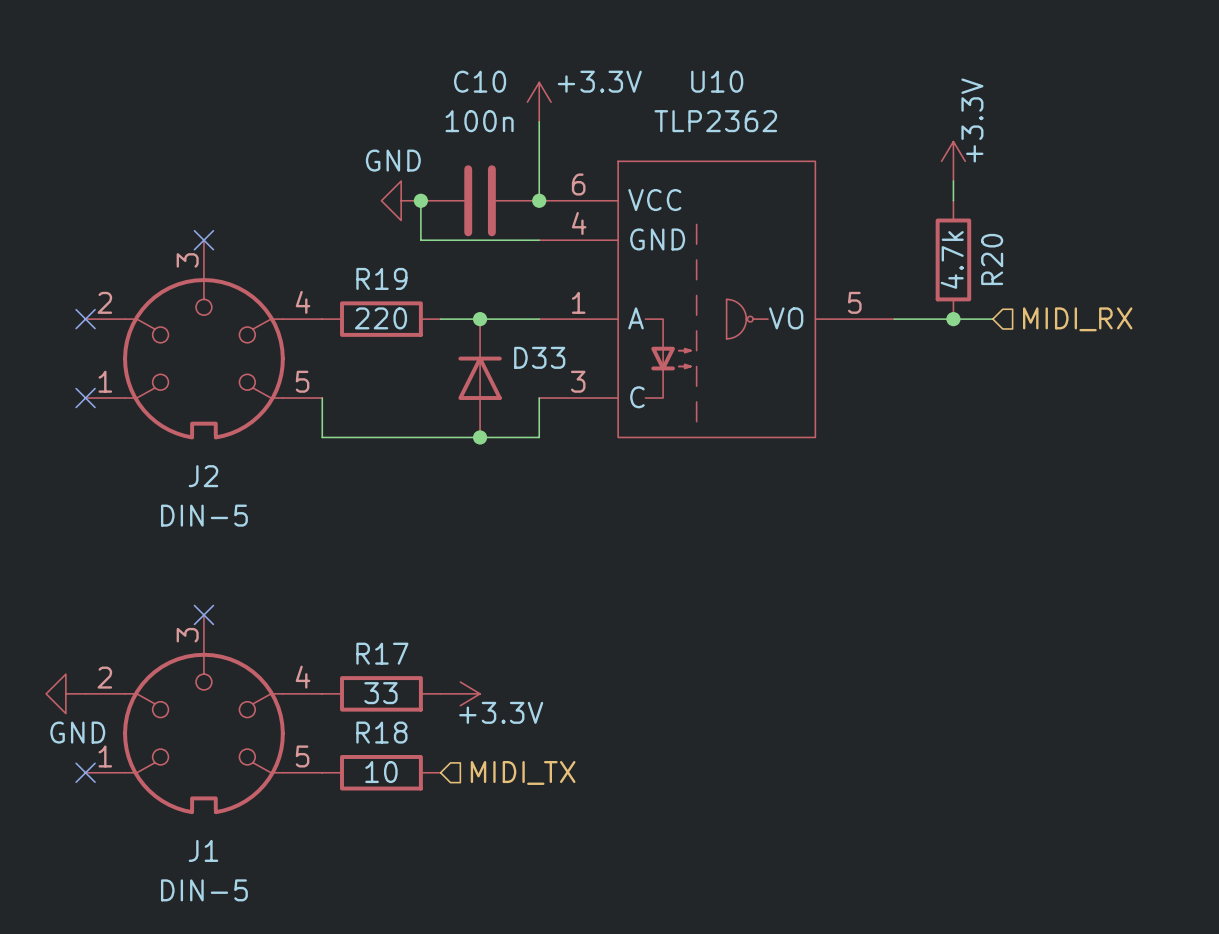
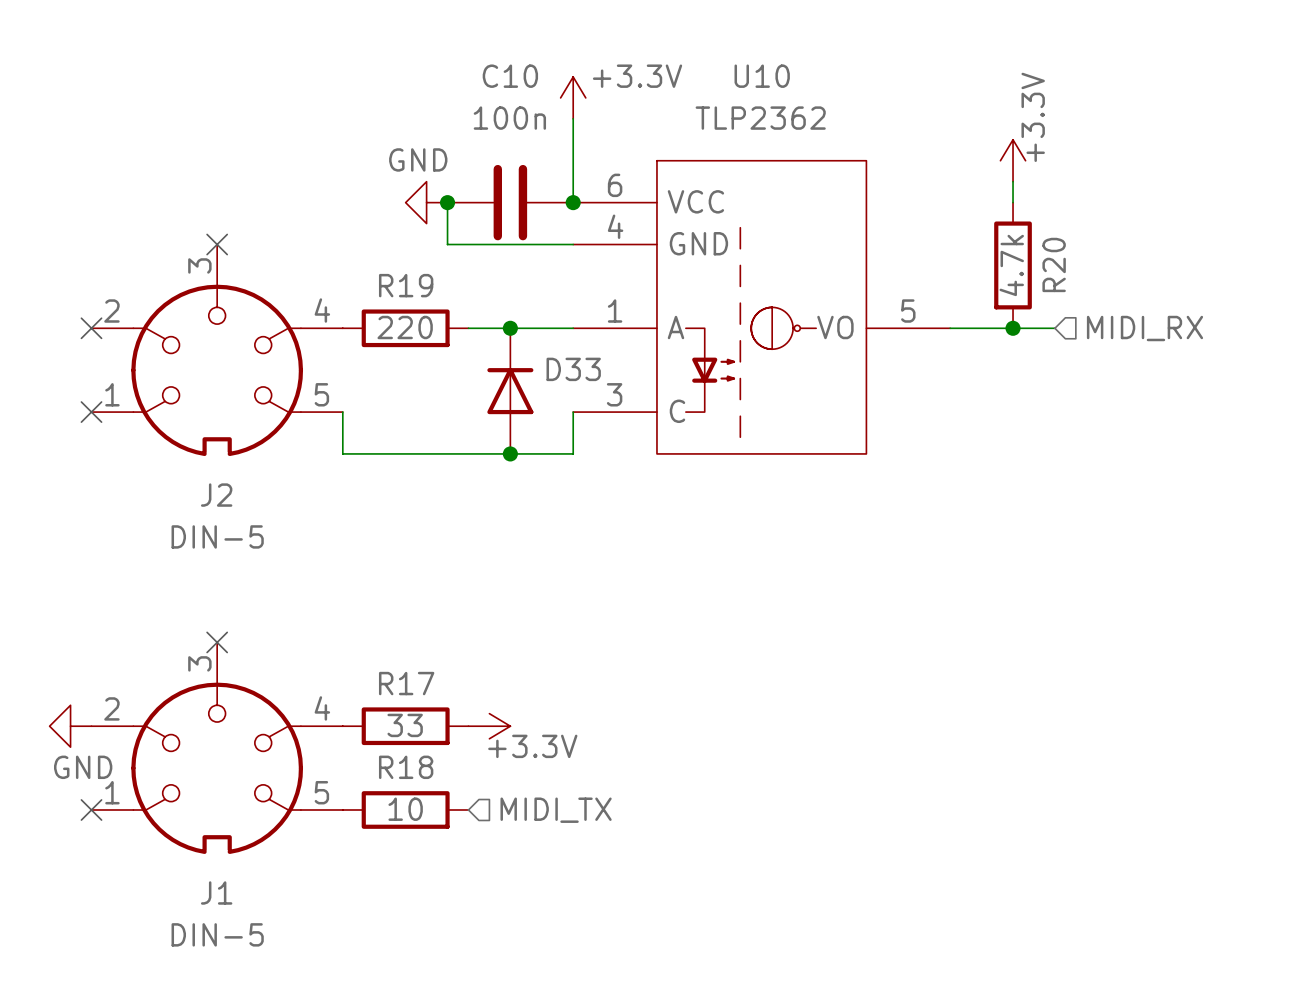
U10 symbol: [539, 161, 895, 438] -> [573, 160, 951, 454]

